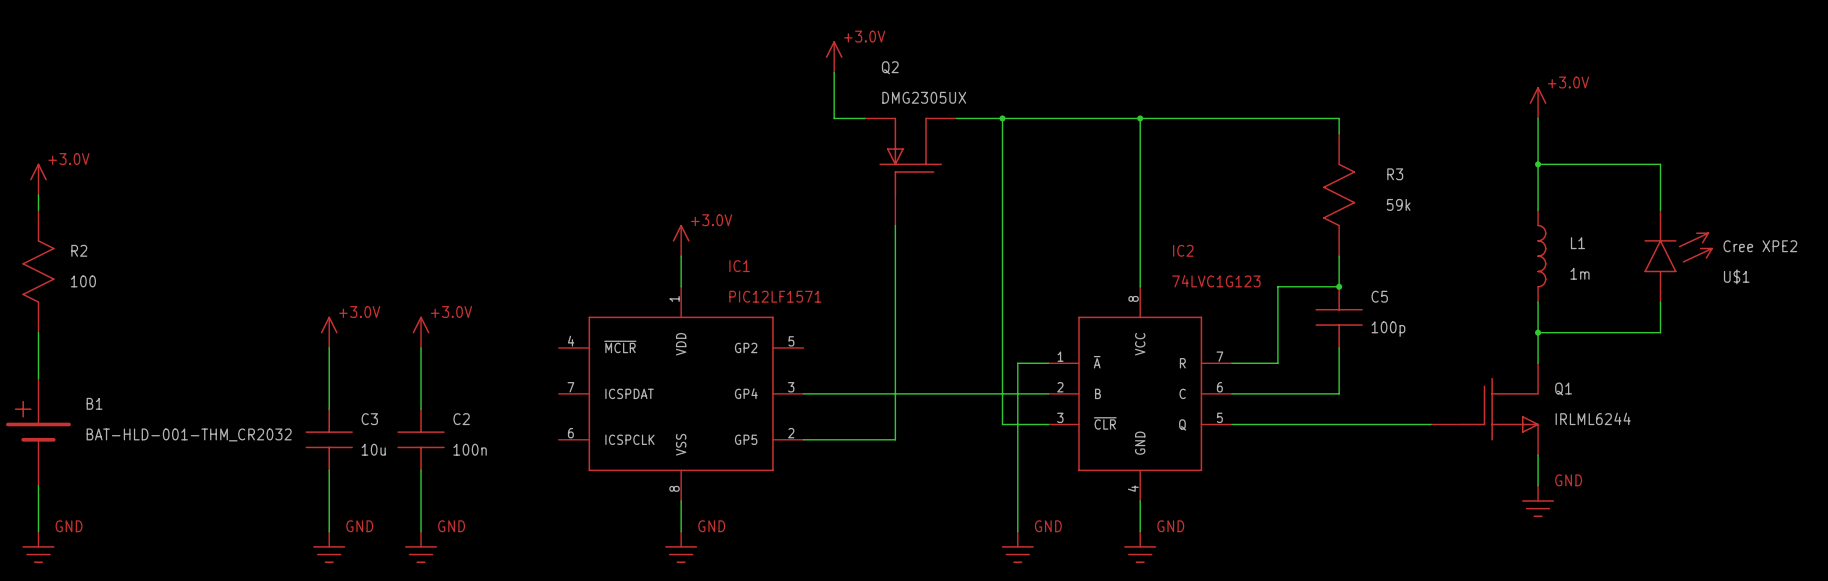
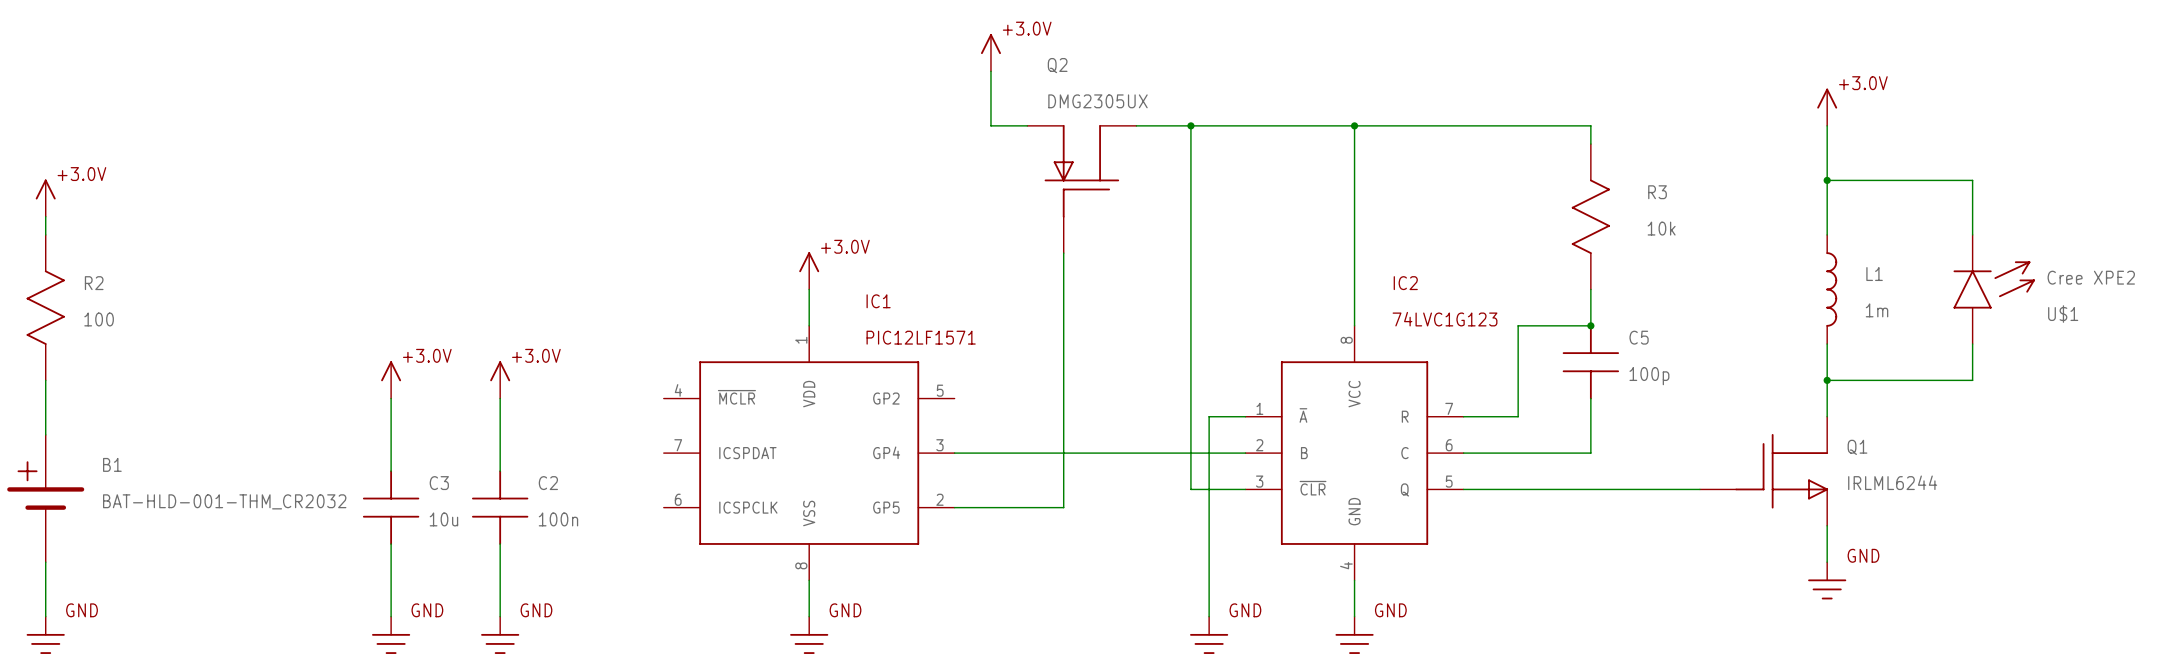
R3 value: 59k (1398, 204) -> 10k (1661, 228)

